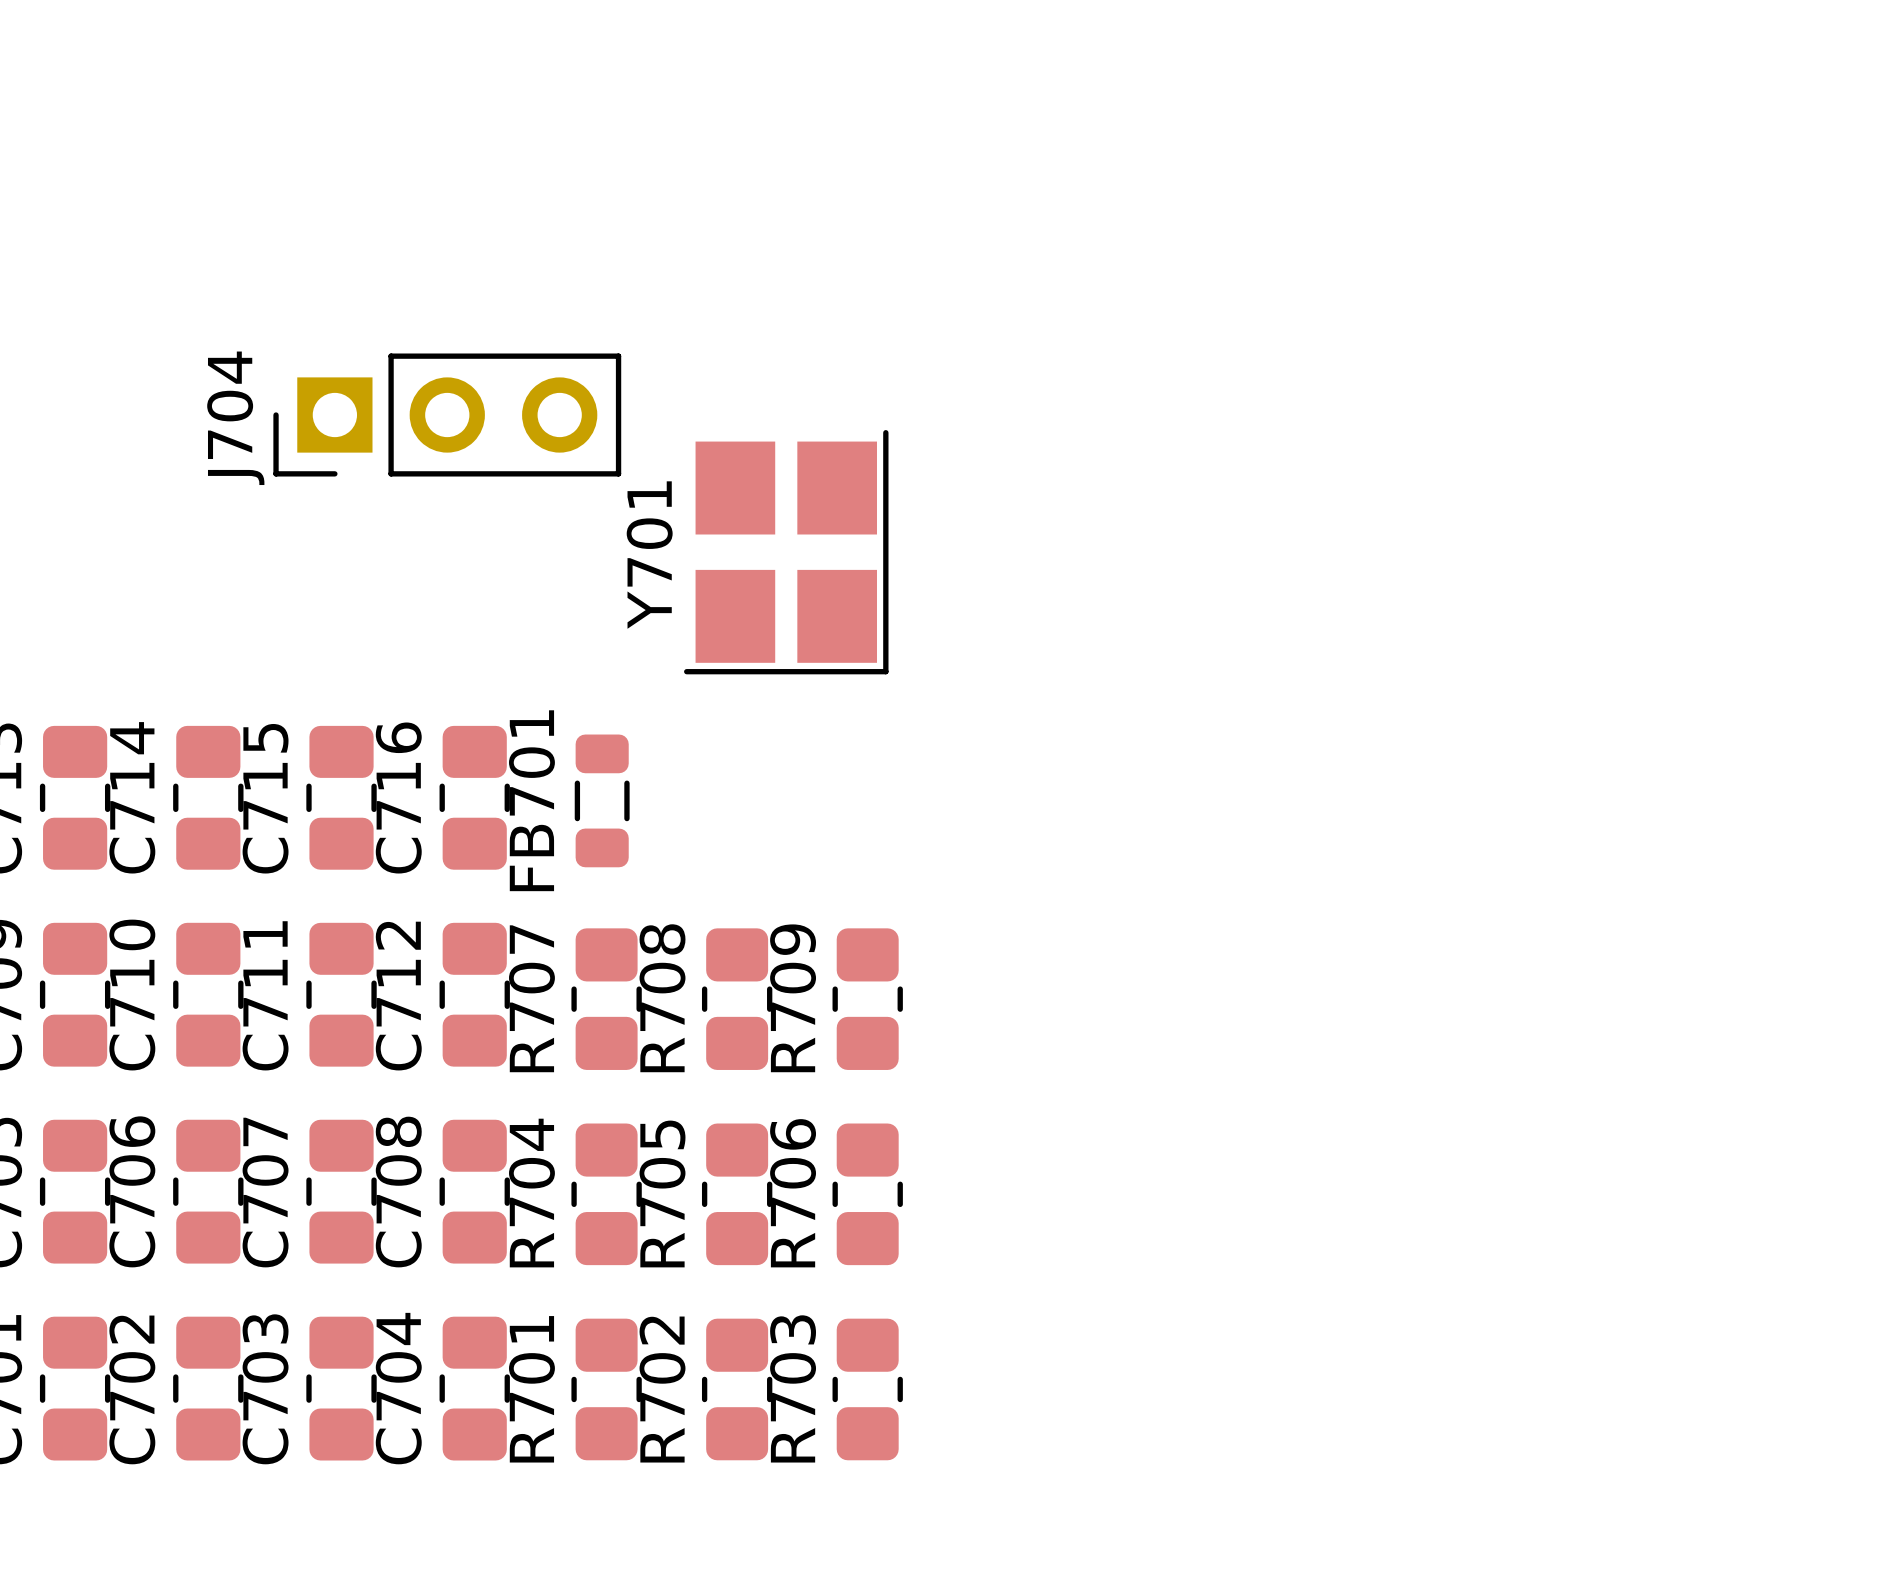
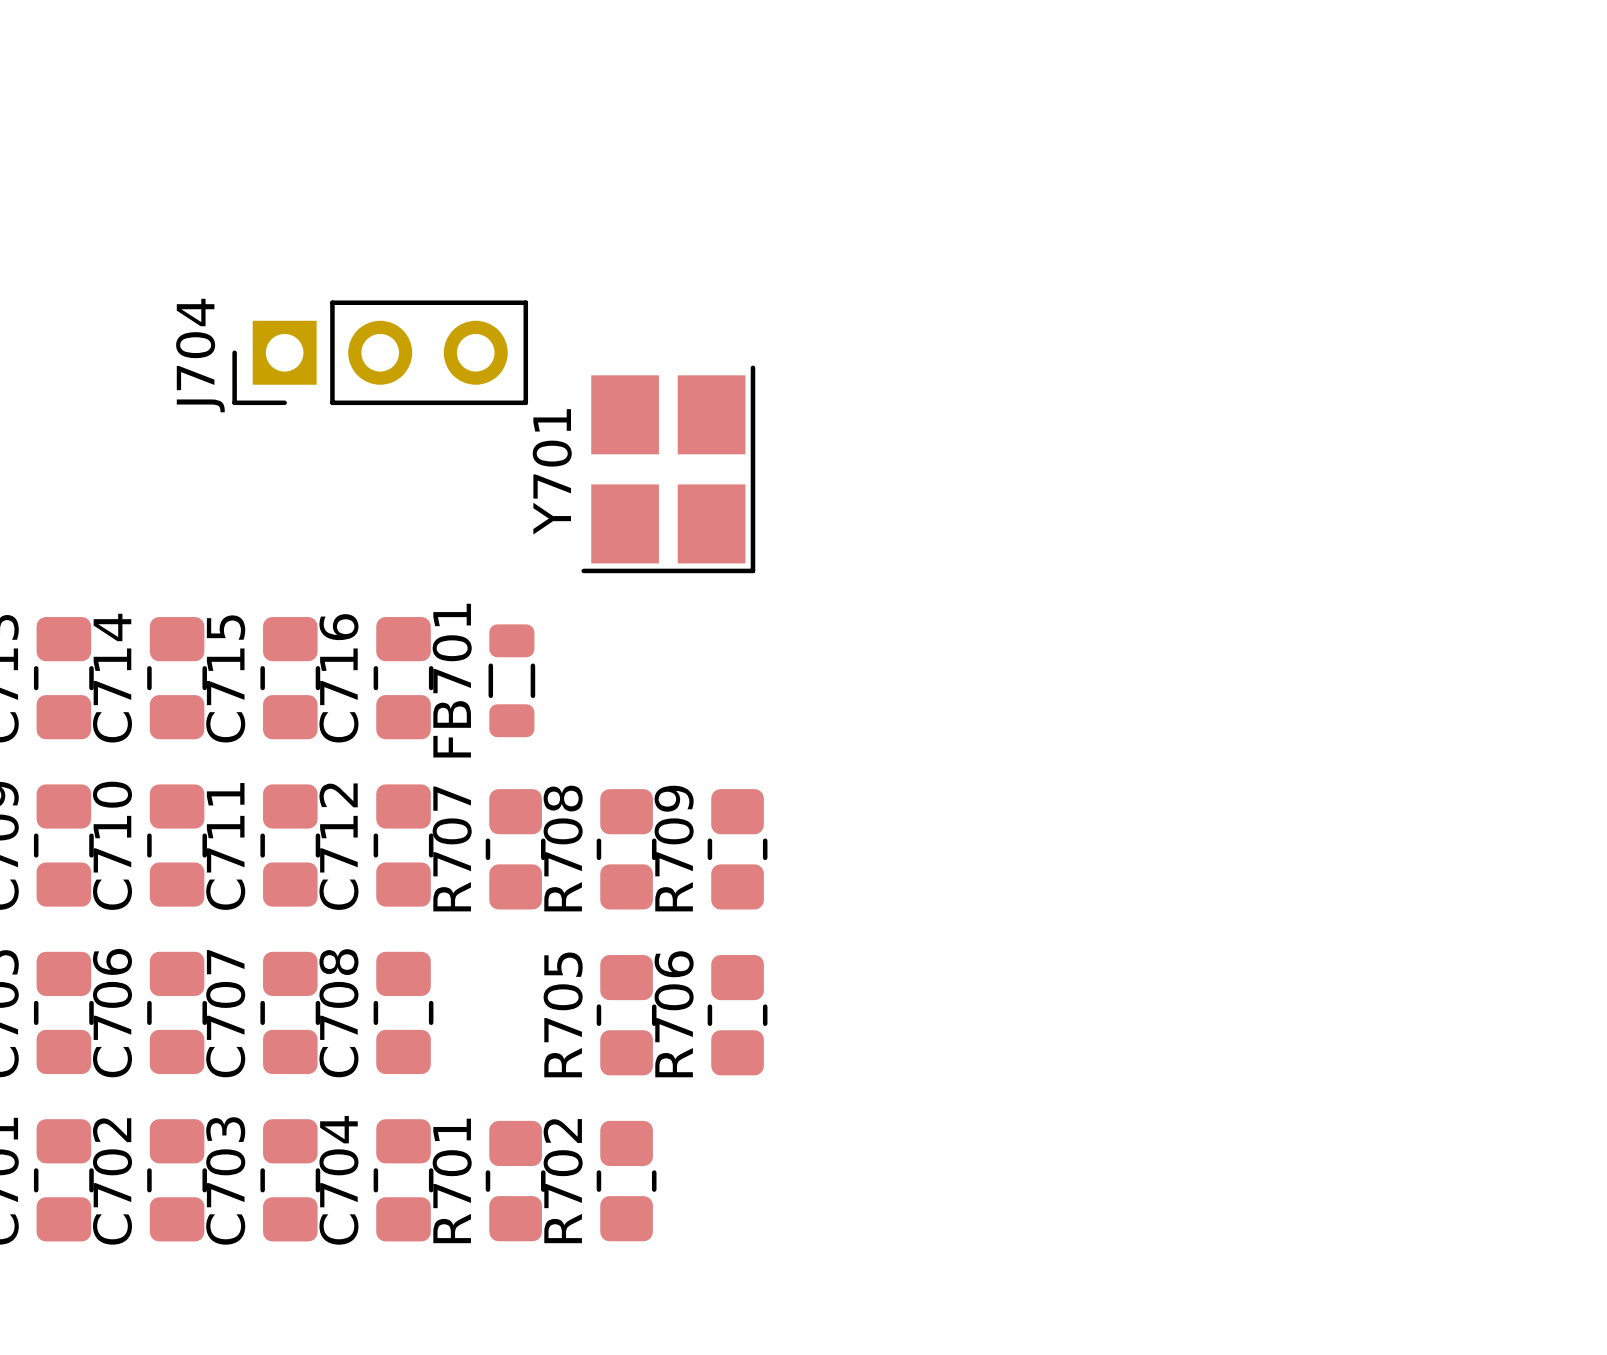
R704: (606, 1194) -> none
R703: (867, 1389) -> none

